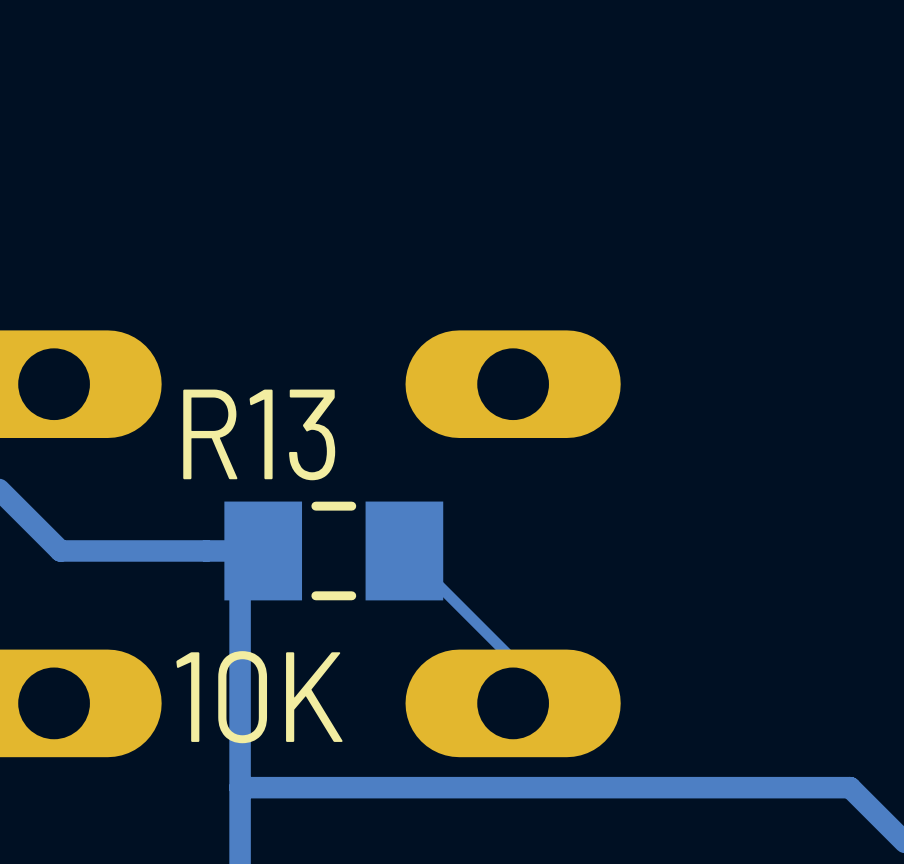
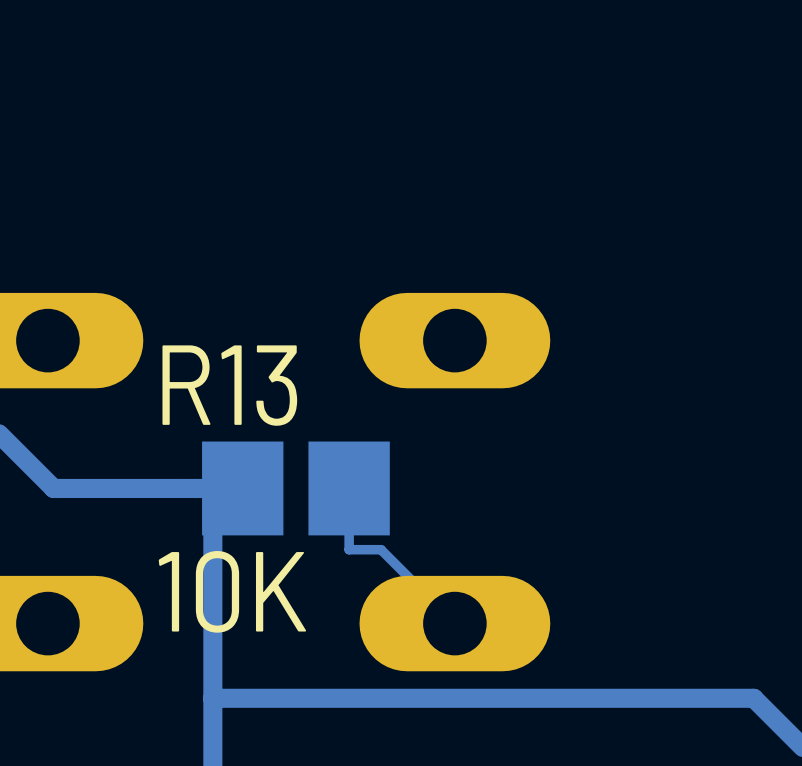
R13 footprint: [224, 501, 444, 601] -> [202, 441, 390, 536]
track: (404, 550) (513, 659) (513, 703) -> (349, 488) (349, 549) (381, 549) (454, 623)

